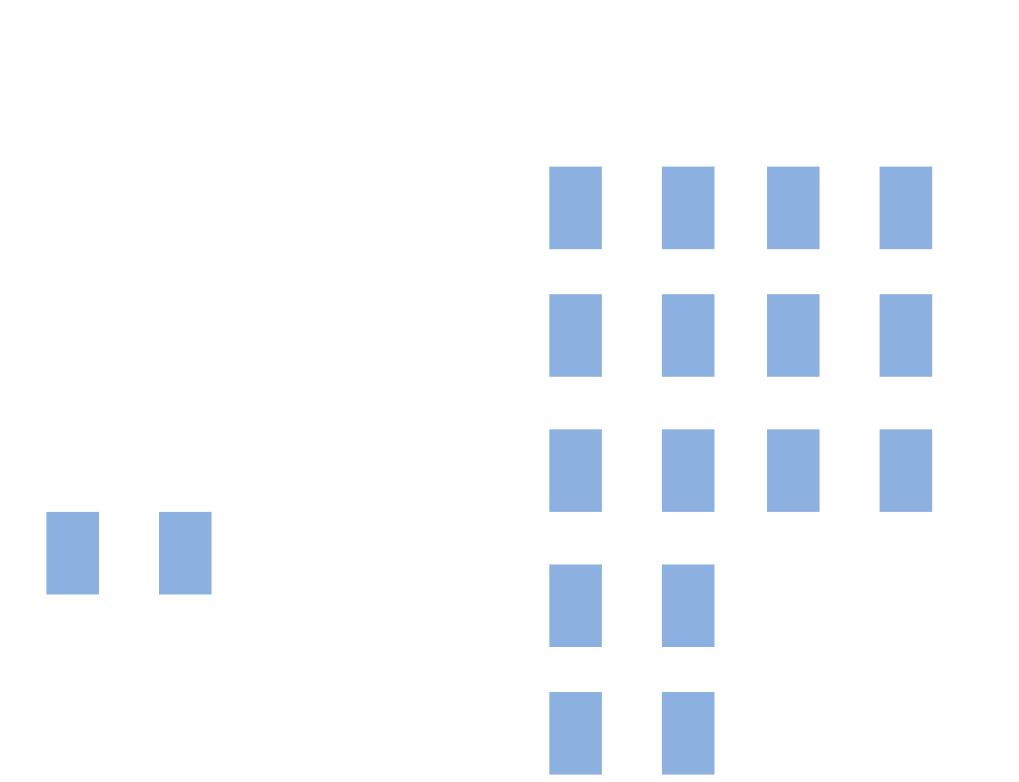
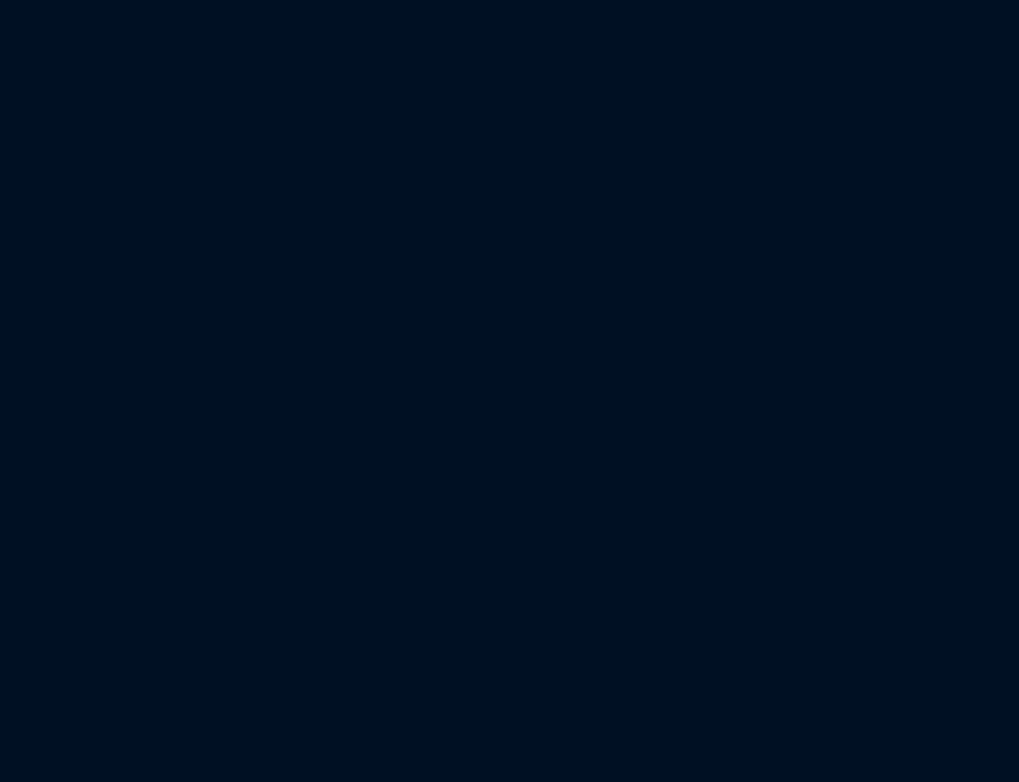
part: (631, 207) -> none
part: (849, 207) -> none
part: (631, 335) -> none
part: (849, 335) -> none
part: (631, 470) -> none
part: (849, 470) -> none
part: (128, 553) -> none
part: (631, 605) -> none
part: (631, 733) -> none

